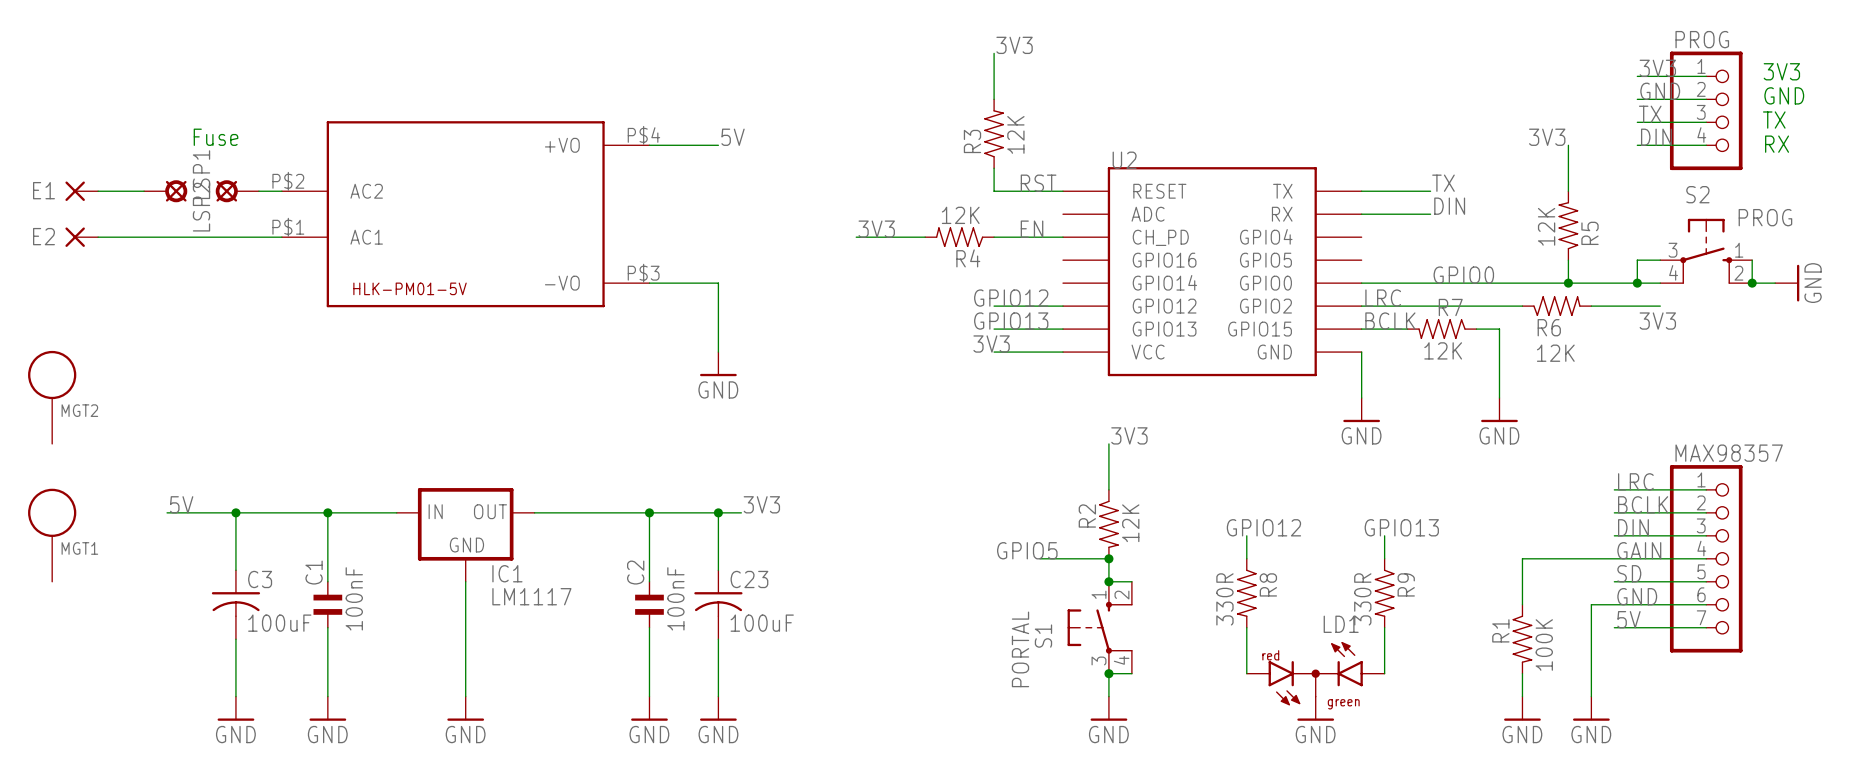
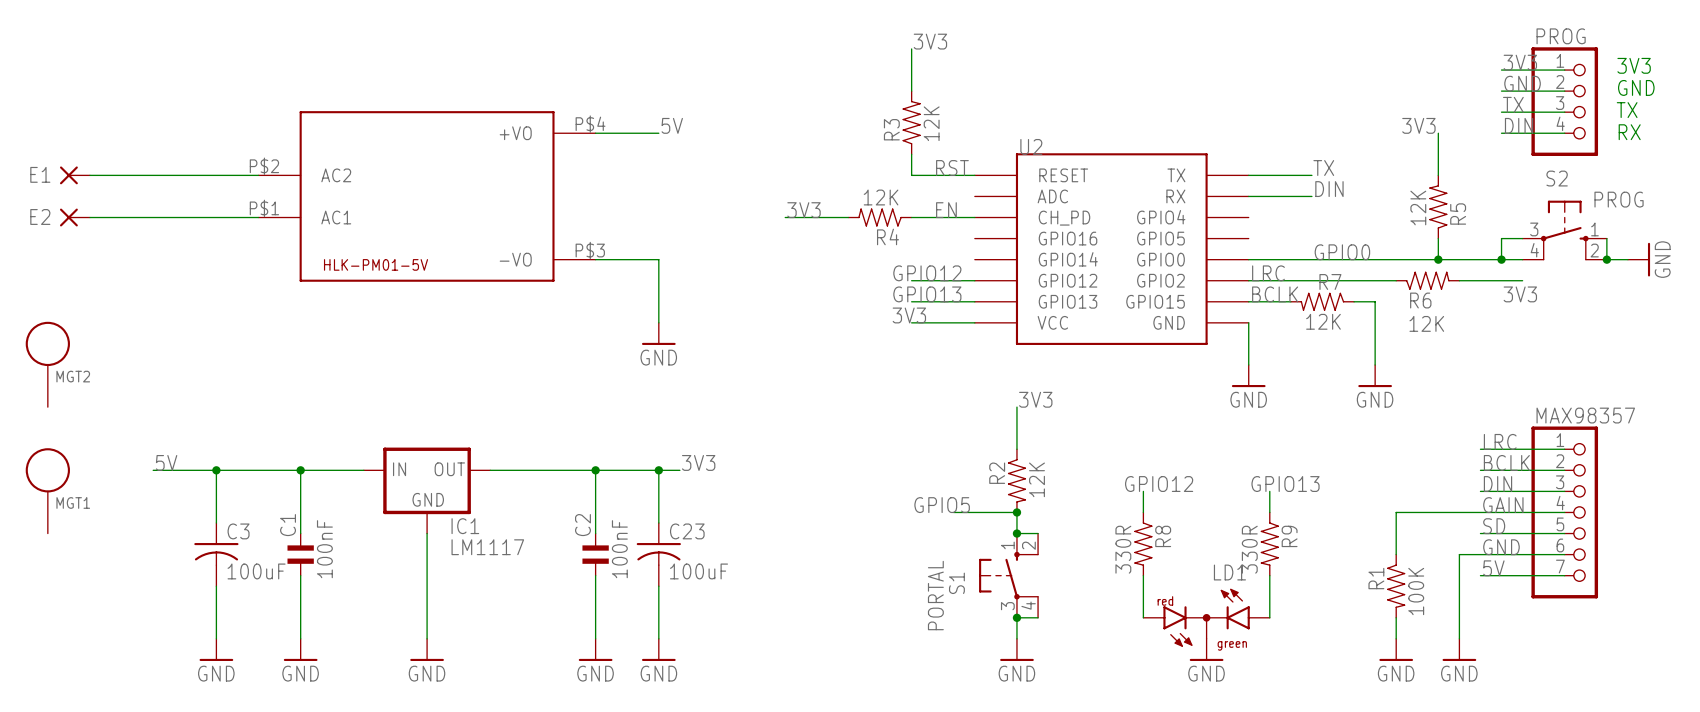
text: Fuse (216, 137) -> none
LSP2: (165, 191) -> none
LSP1: (237, 191) -> none

